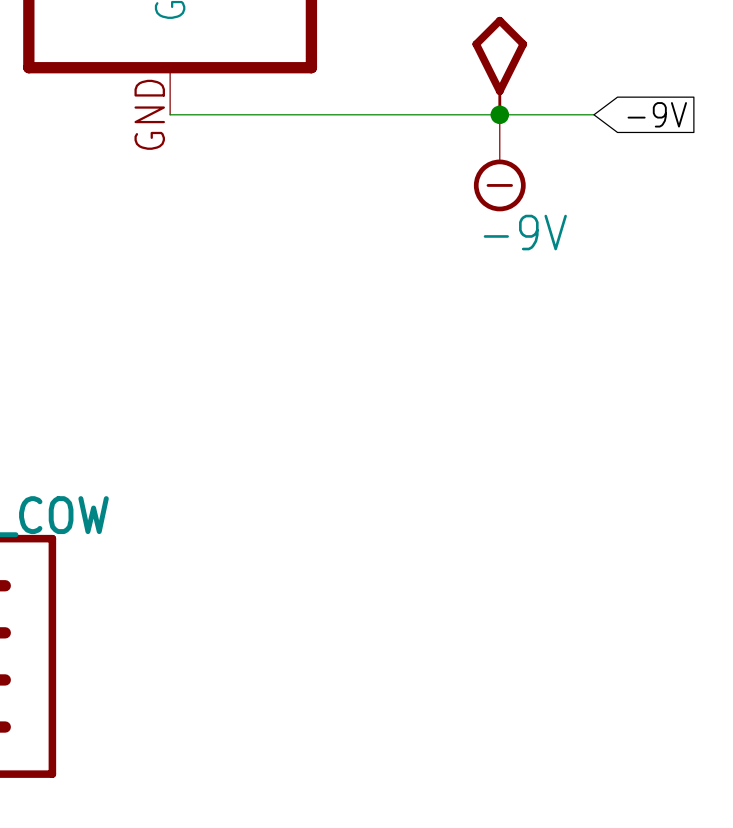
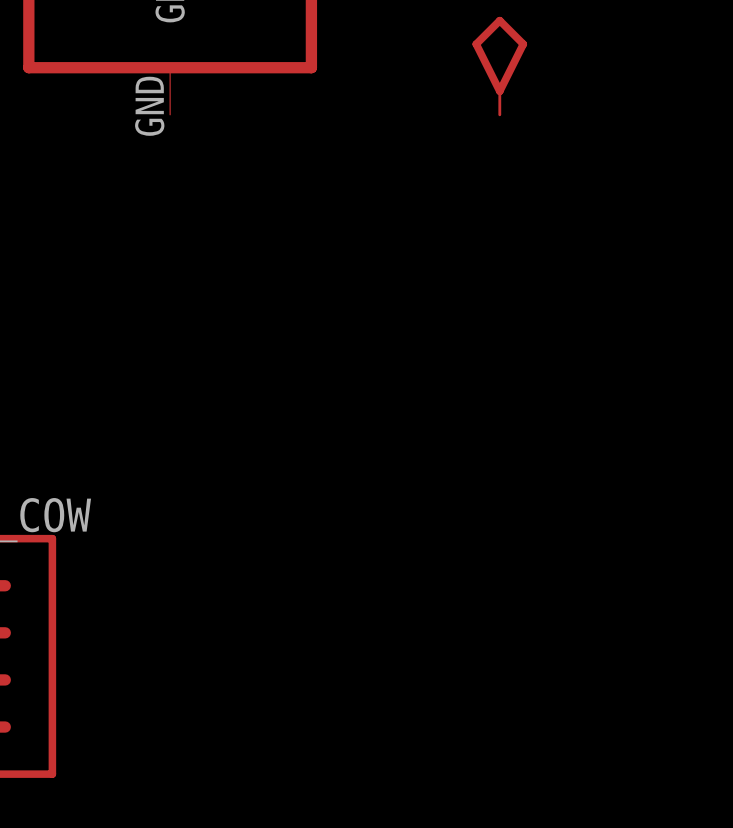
wire: (170, 114) (593, 114) -> none
junction: (499, 114) -> none
global label: -9V (657, 114) -> none
power symbol: -9V (499, 163) -> none

